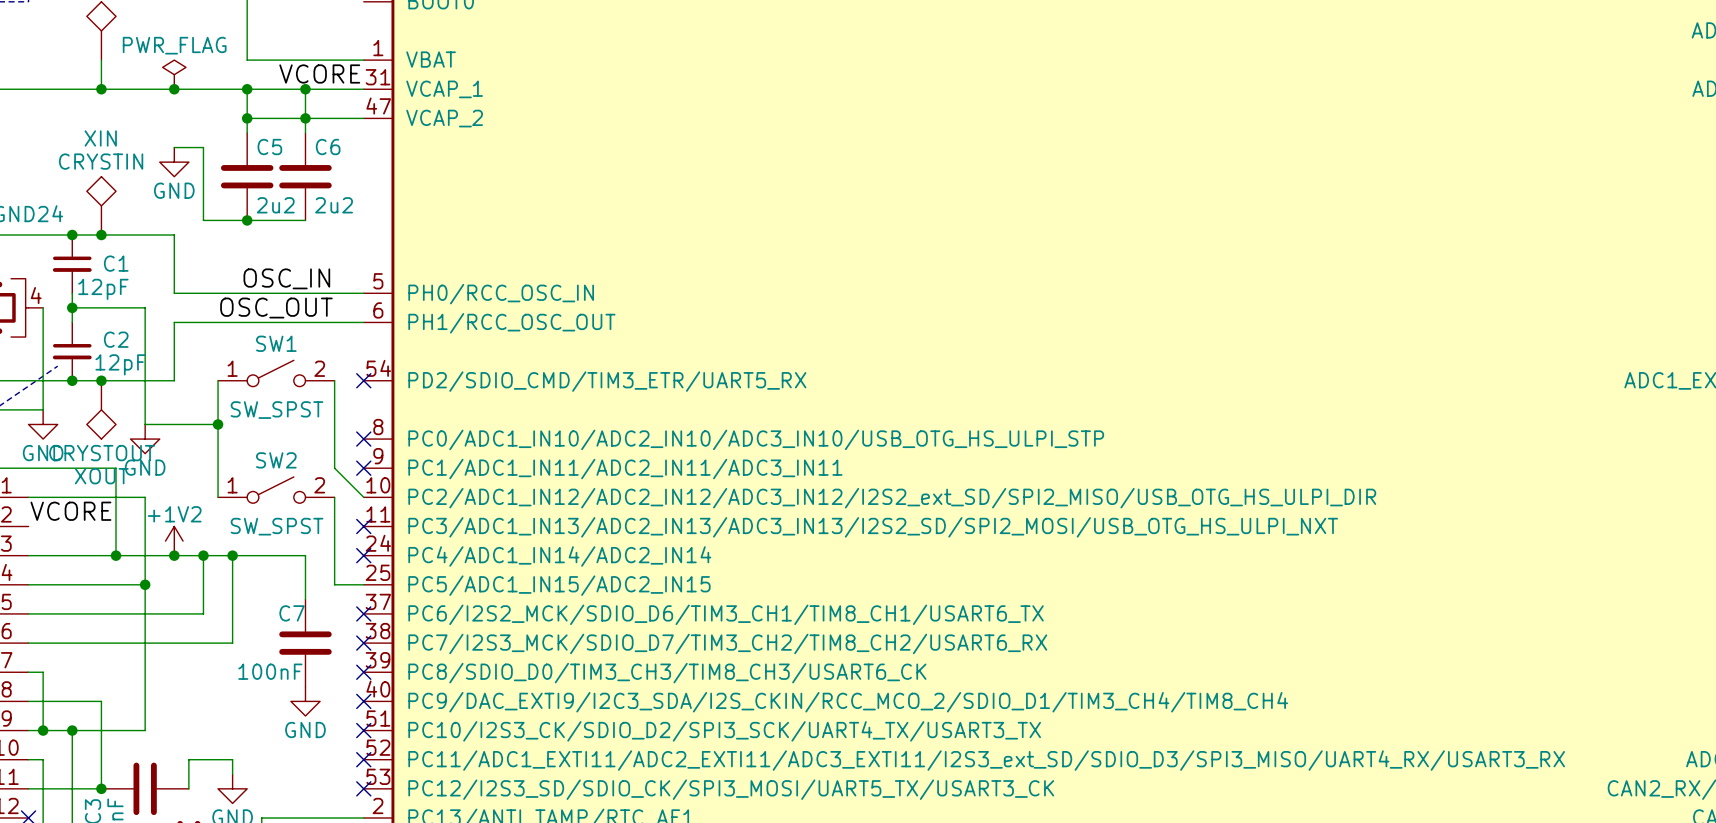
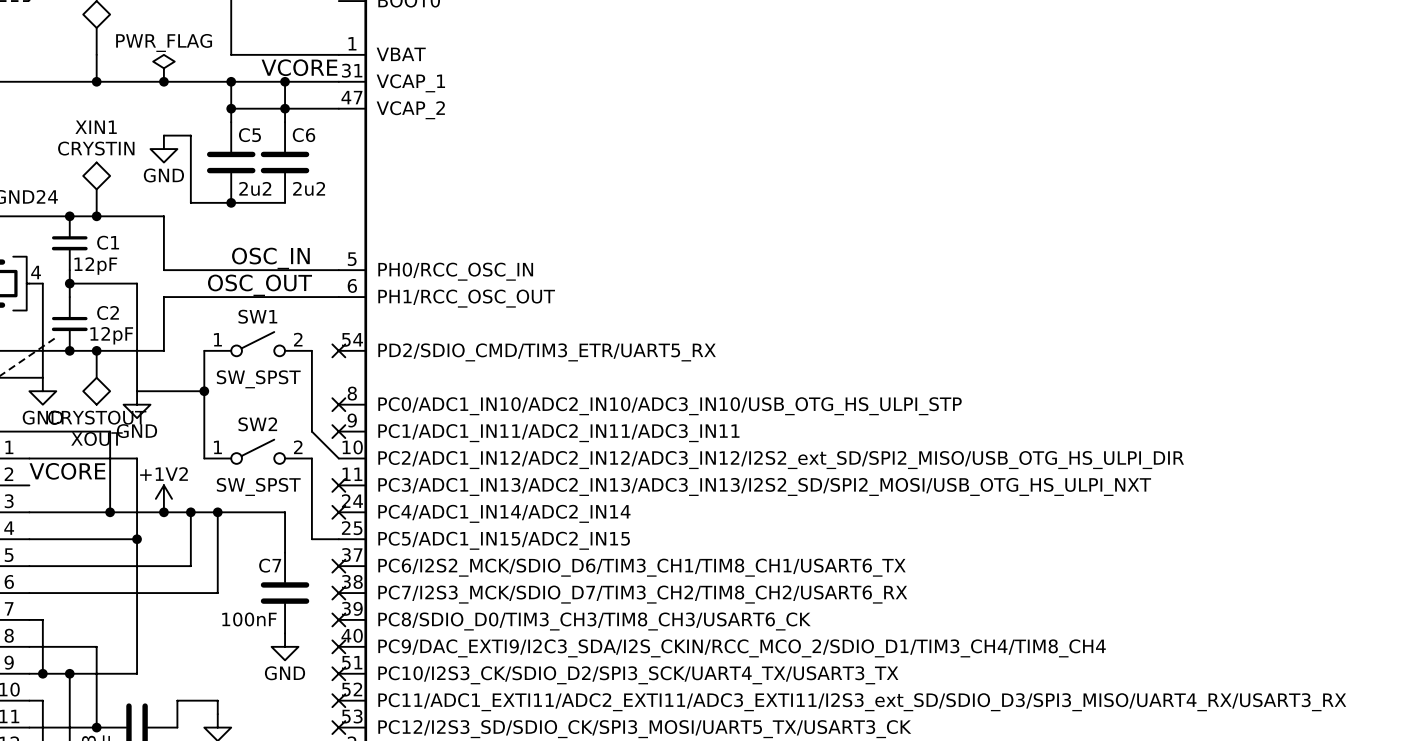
XIN name: XIN (100, 138) -> XIN1 (96, 127)

